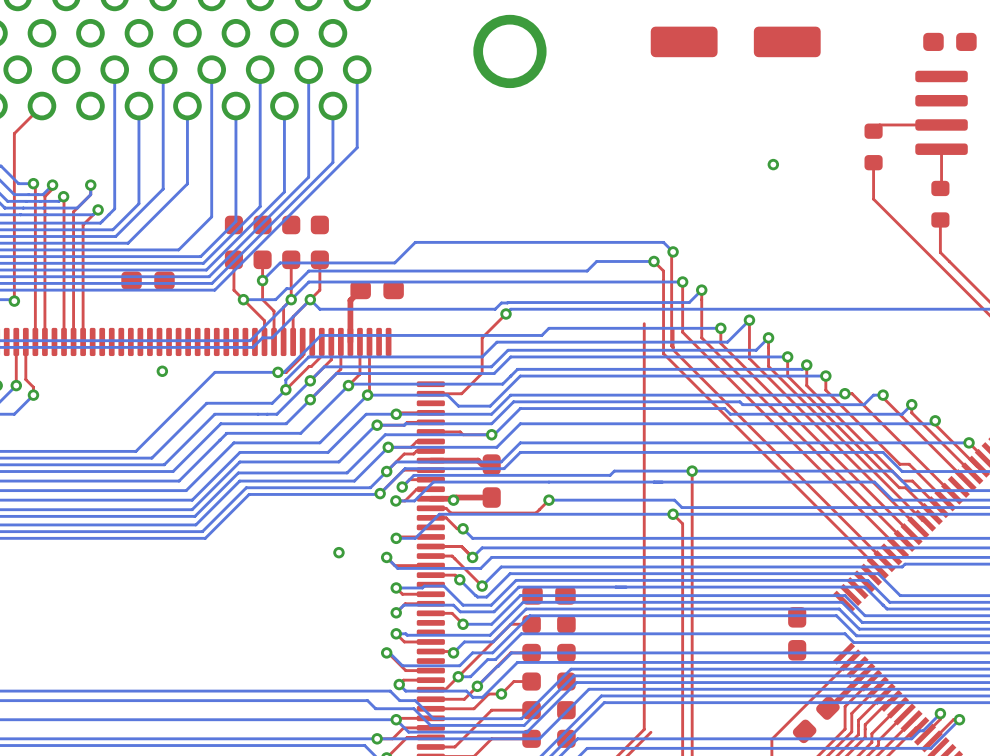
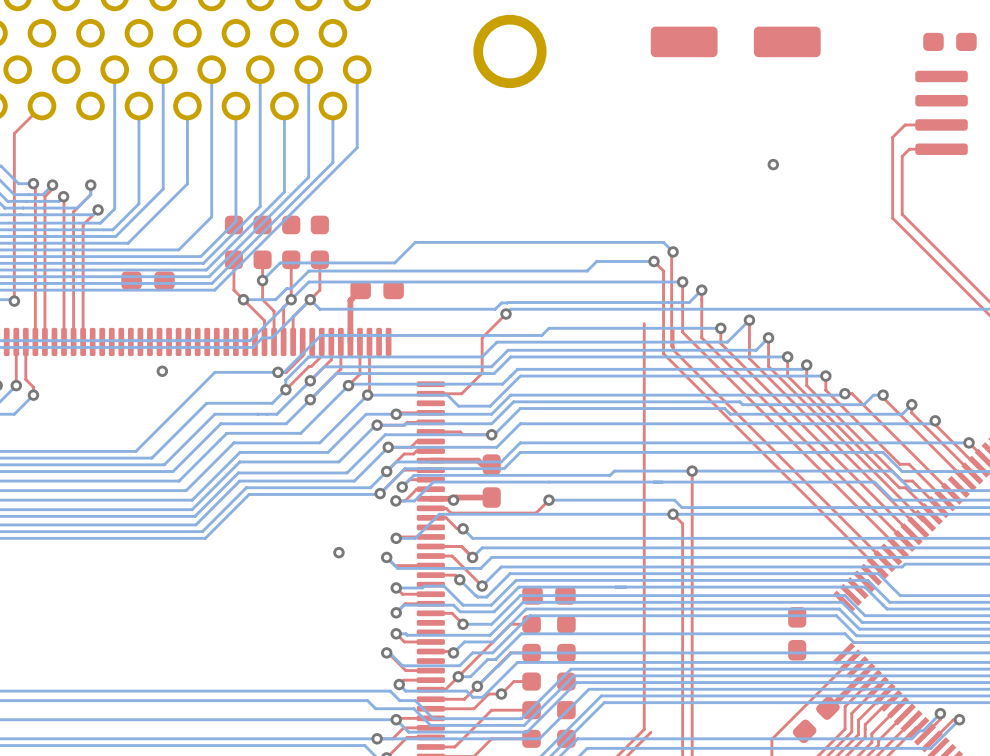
top track: (905, 124) (879, 124) (873, 131) -> none
part: (873, 146) -> none
top track: (941, 149) (940, 188) -> (941, 149) (909, 149) (902, 156) (902, 214) (940, 252)
top track: (873, 162) (873, 199) (892, 218) -> (905, 124) (892, 137) (892, 218)
part: (940, 204) -> none
top track: (940, 219) (940, 252) -> none

